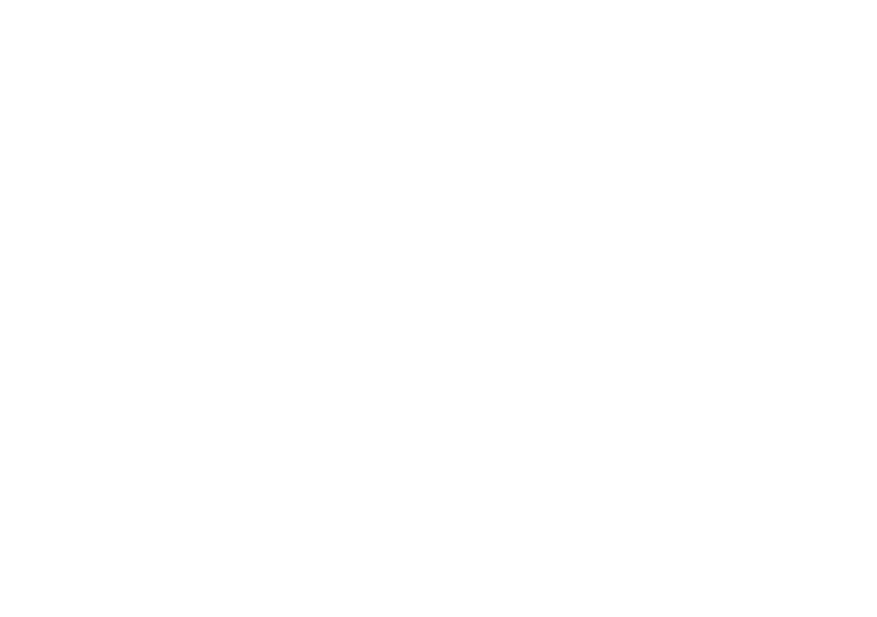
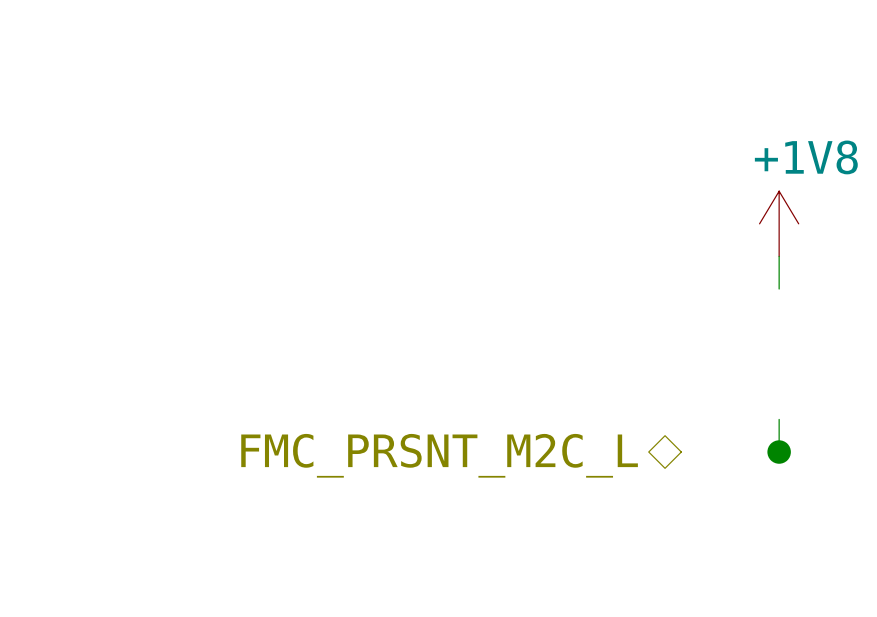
power symbol: none -> +1V8 (779, 223)
wire: none -> (779, 256) (779, 289)
wire: none -> (779, 419) (779, 452)
junction: none -> (779, 452)
hierarchical label: none -> FMC_PRSNT_M2C_L (439, 455)

